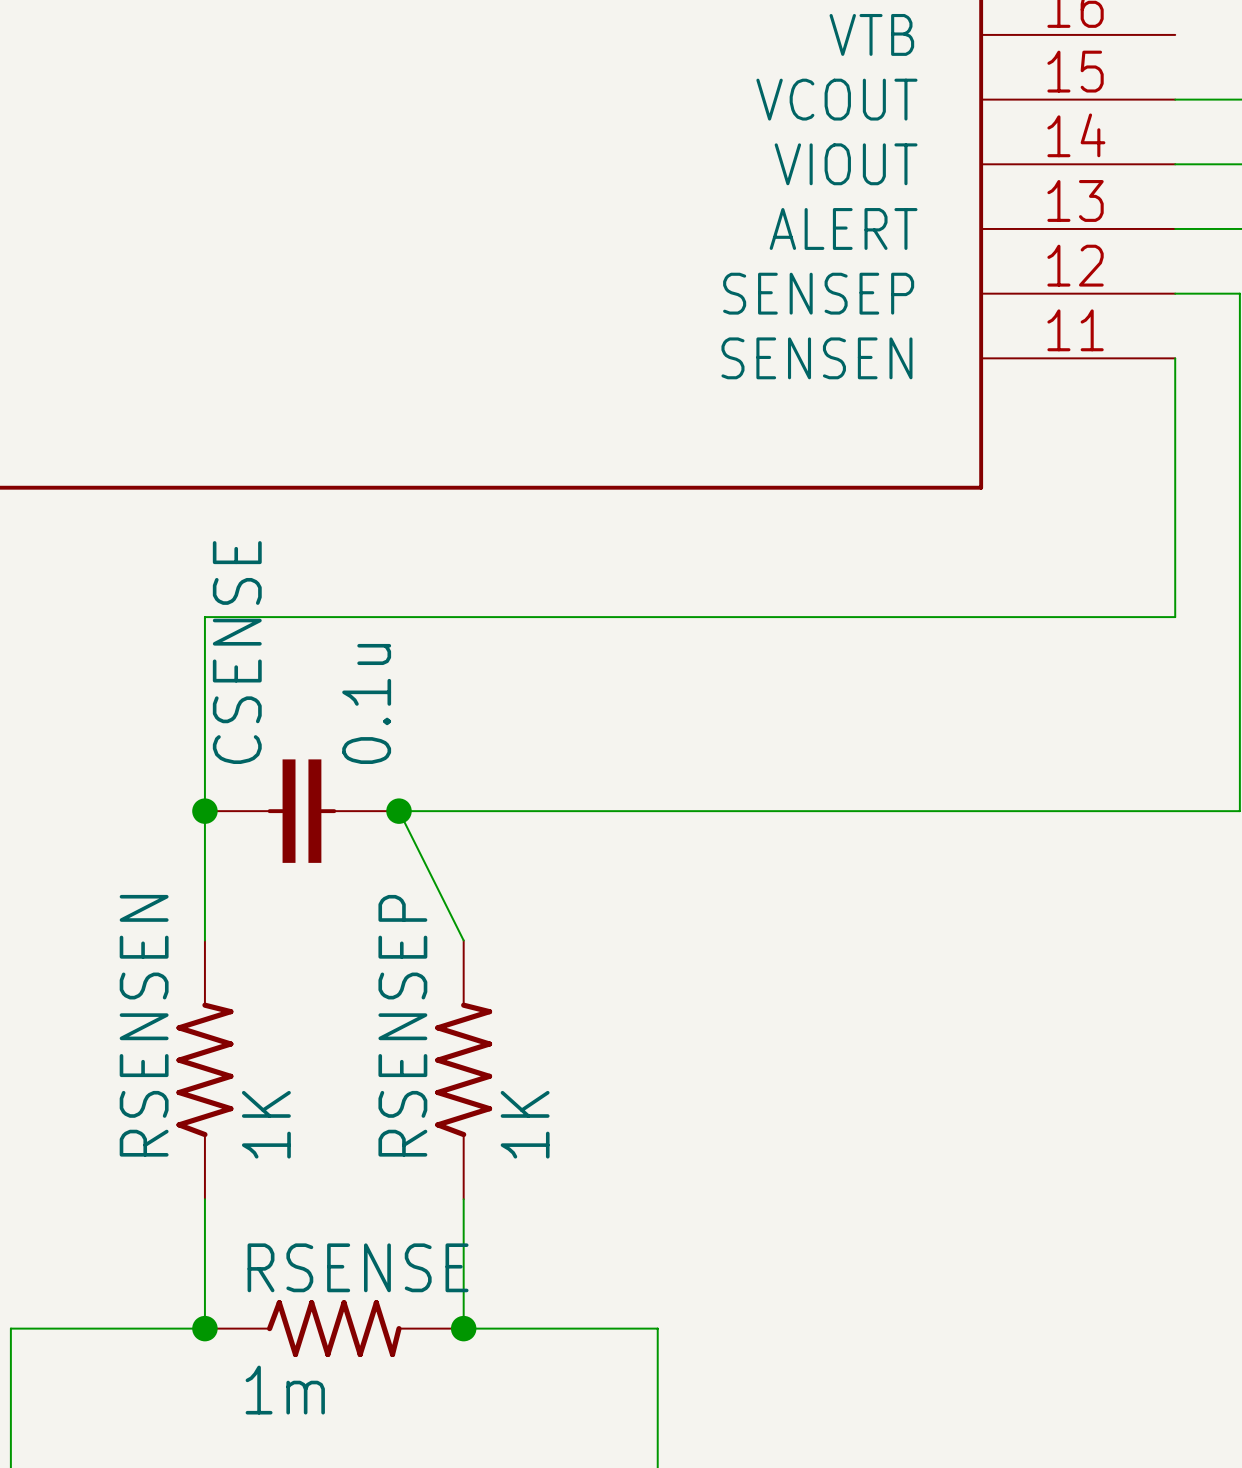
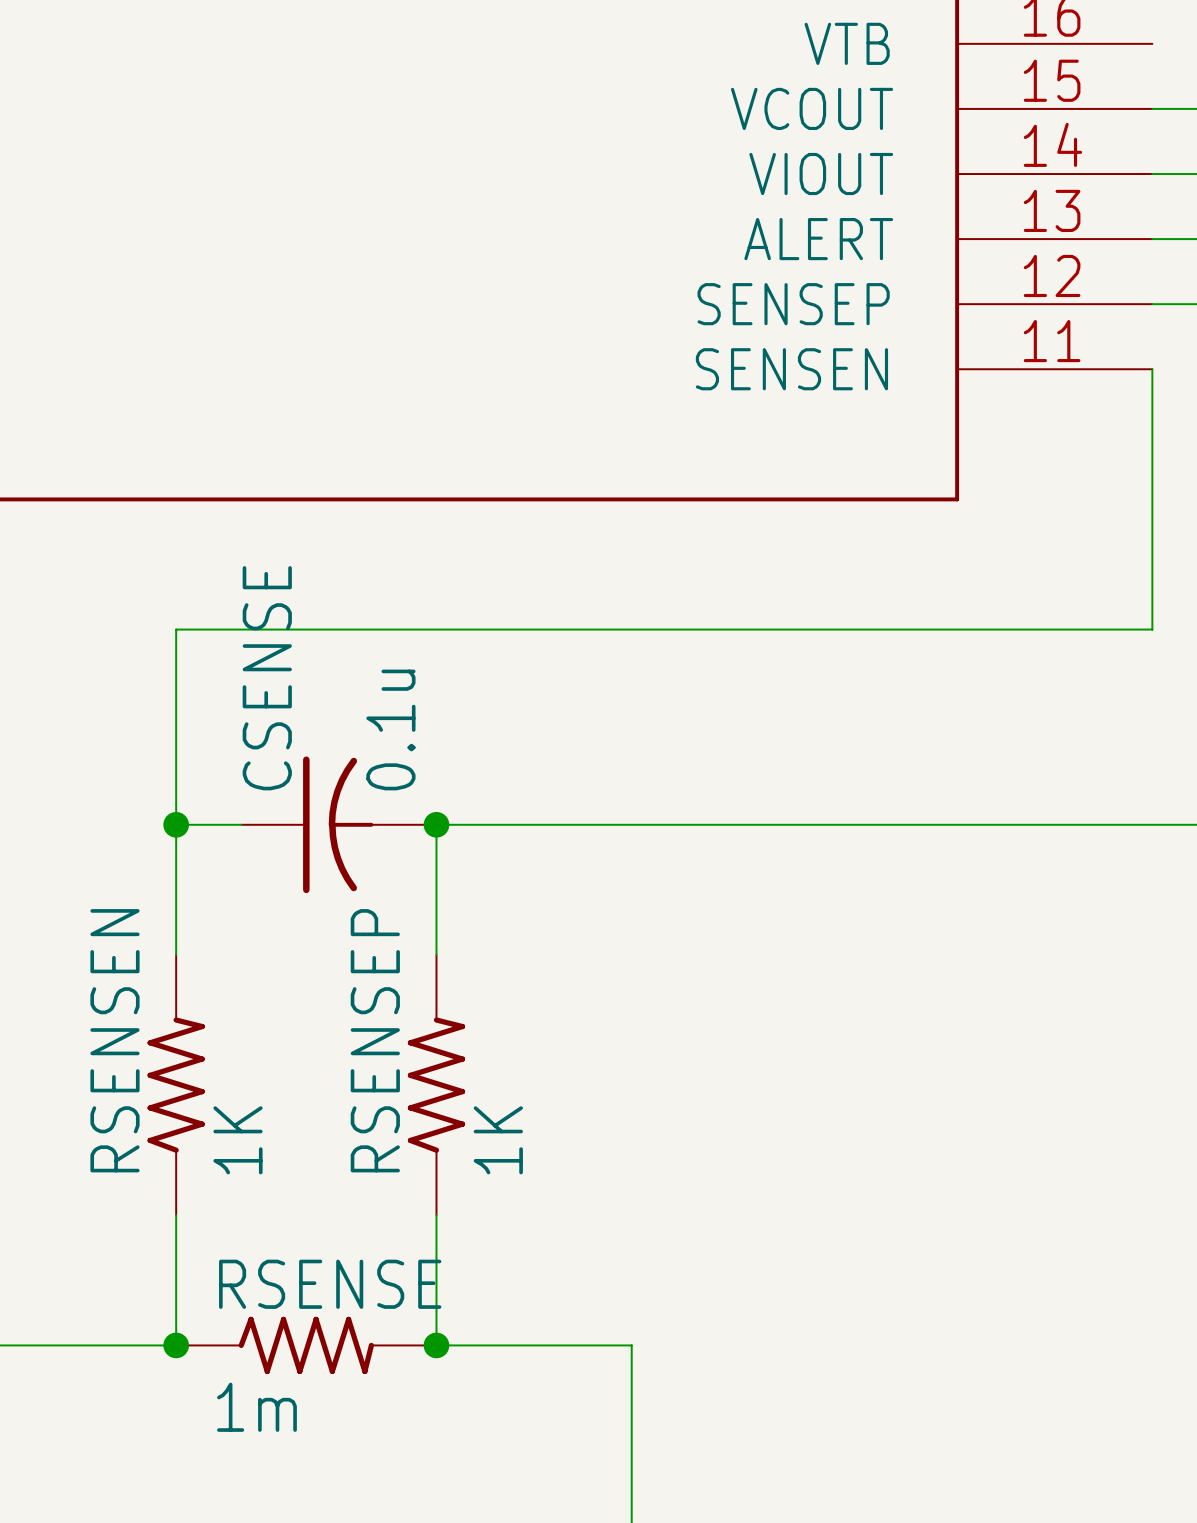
CSENSE: 0.1u (301, 811) -> none
CSENSE: none -> 0.1u (338, 824)
junction position: (398, 811) -> (436, 824)
wire: (463, 811) (398, 811) (463, 940) -> (436, 824) (436, 954)

